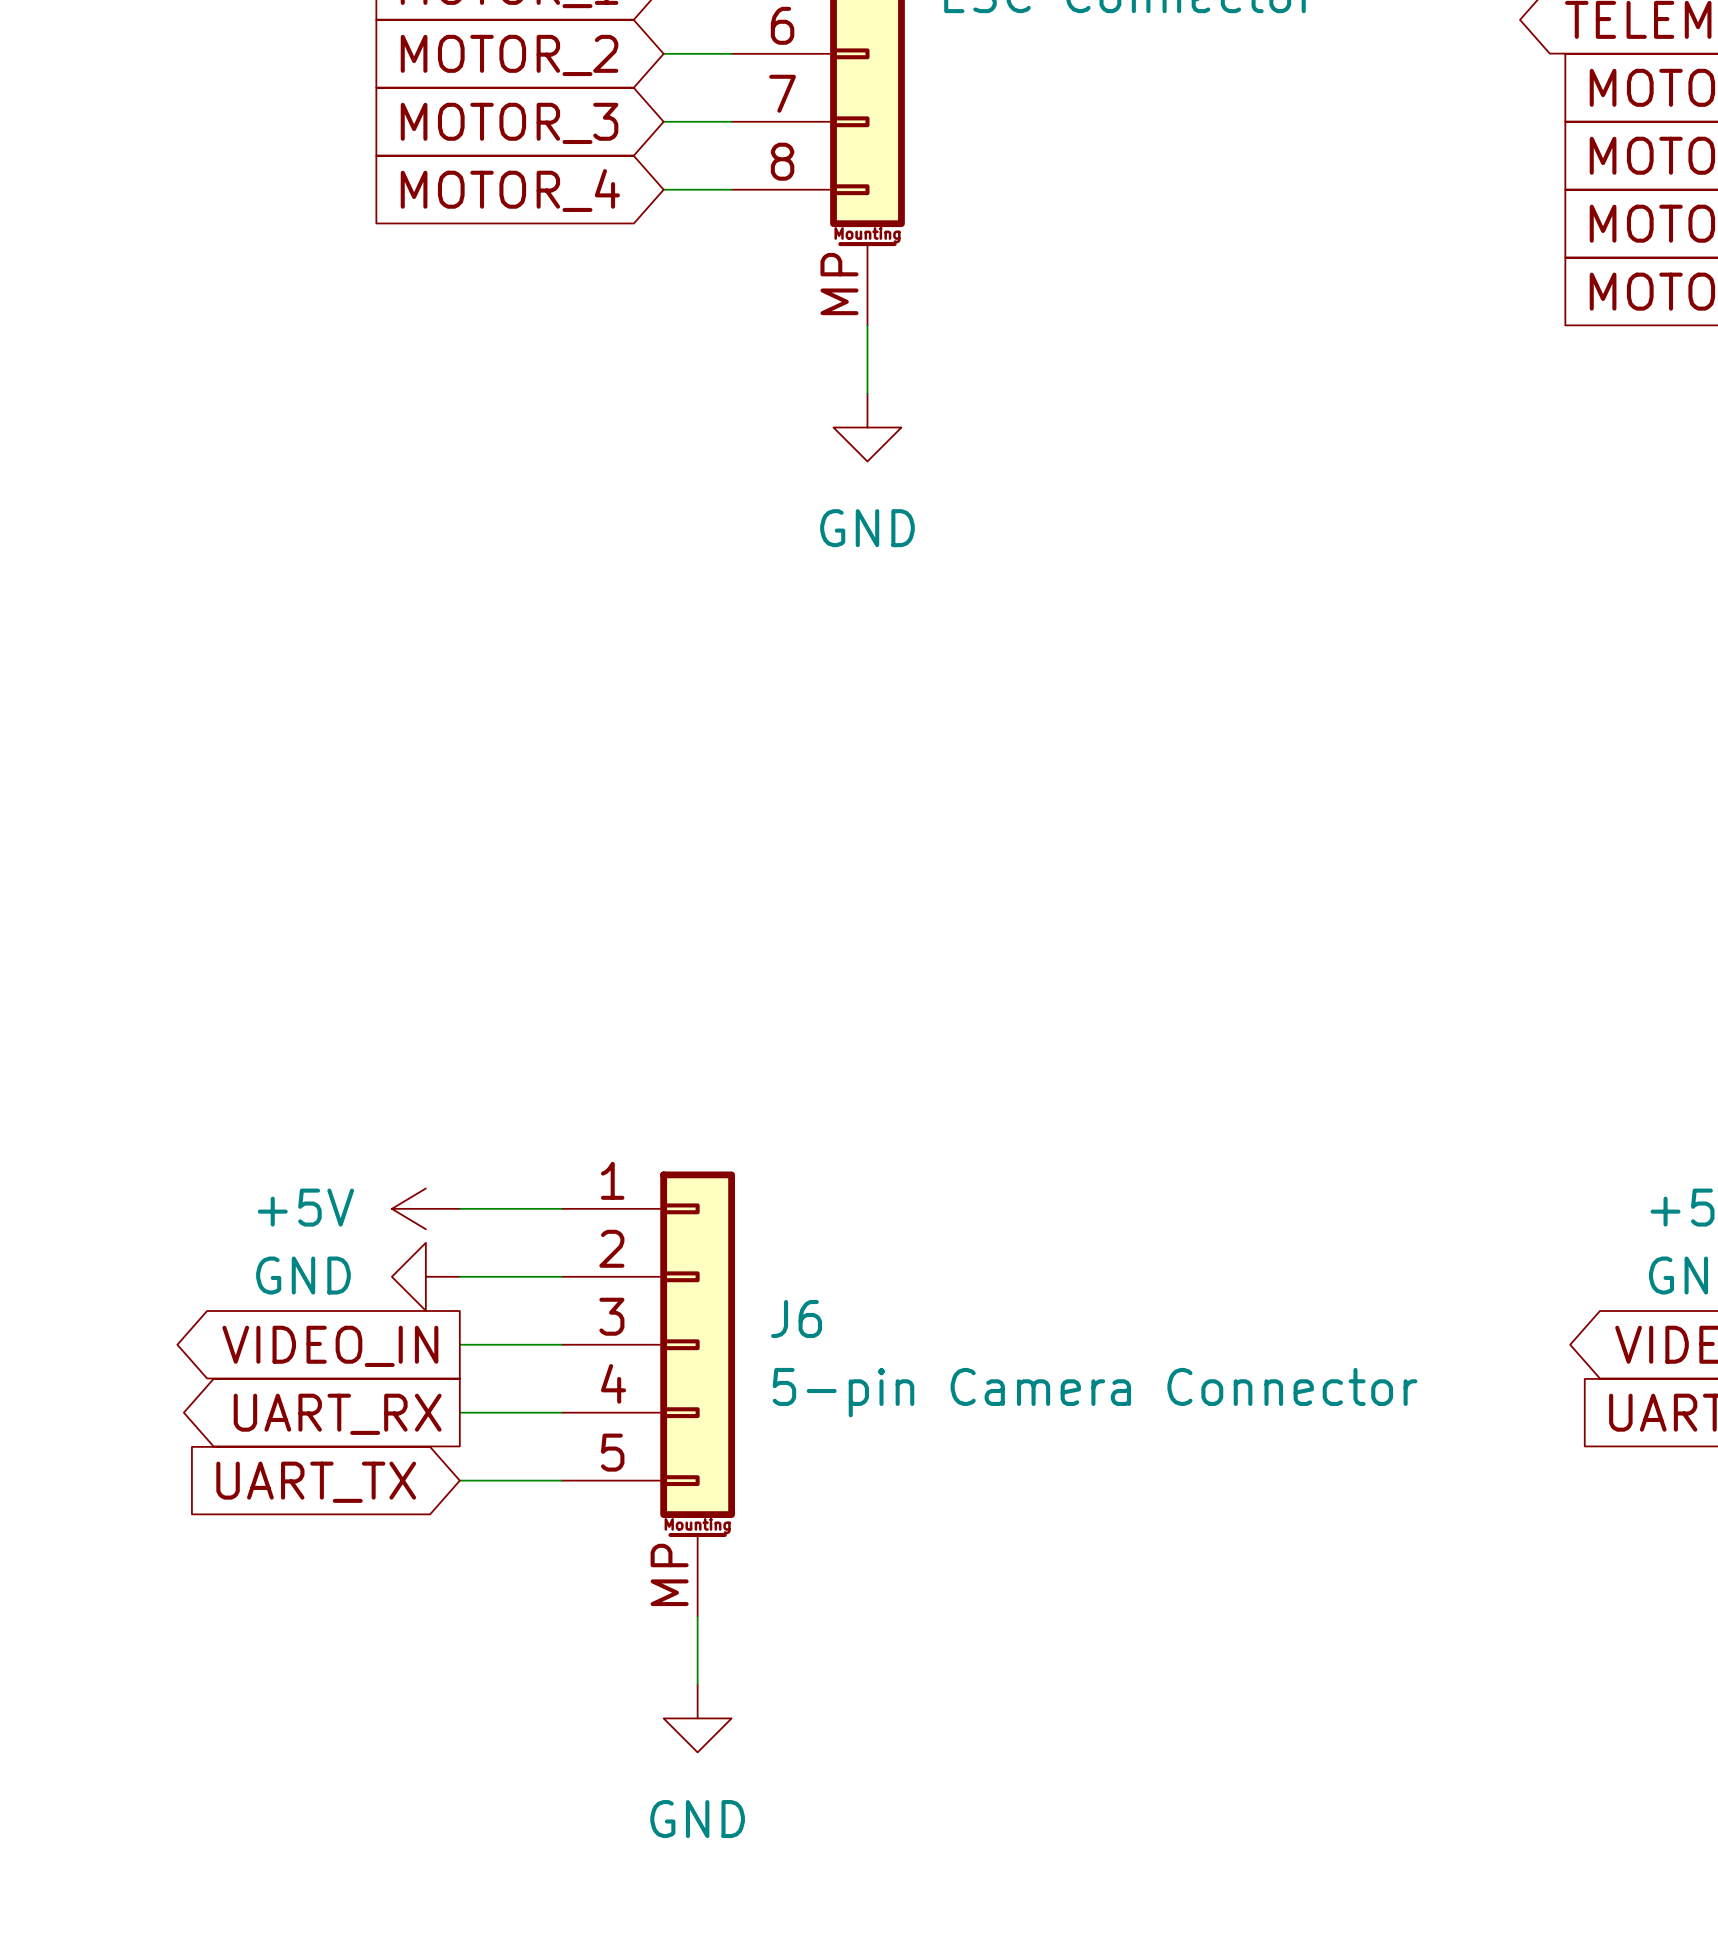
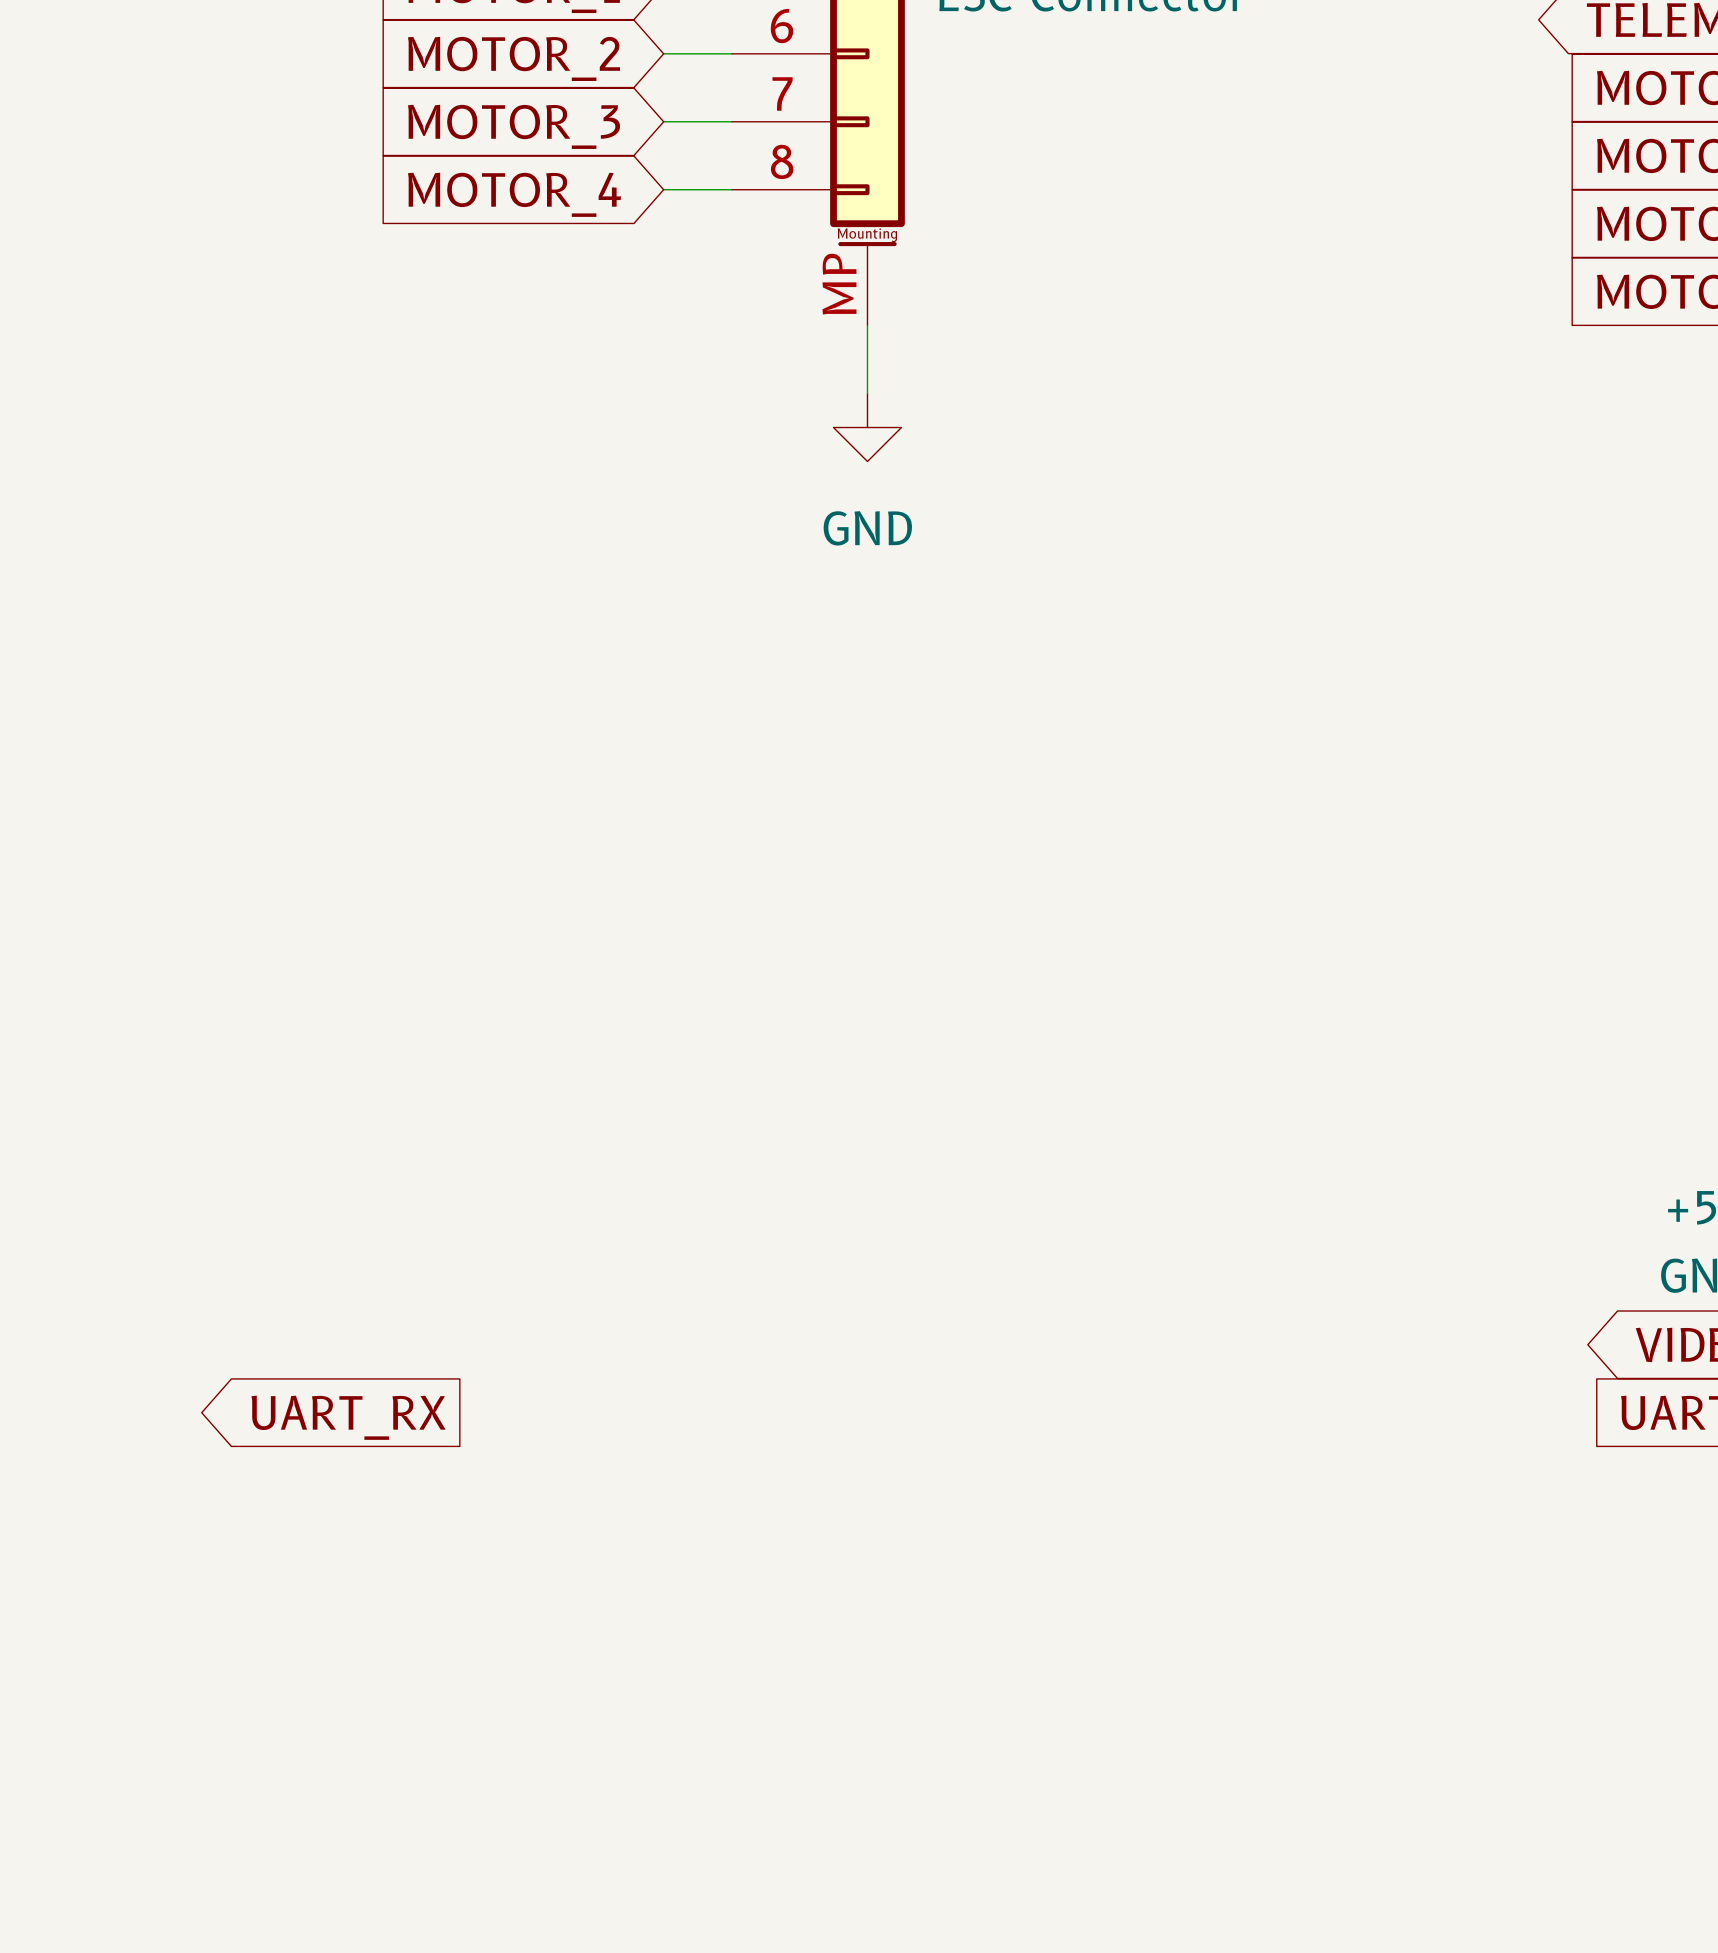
power symbol: +5V (425, 1208) -> none
wire: (459, 1208) (561, 1208) -> none
power symbol: GND (425, 1276) -> none
wire: (459, 1276) (561, 1276) -> none
wire: (459, 1344) (561, 1344) -> none
global label: VIDEO_IN (330, 1346) -> none
J6: 5-pin Camera Connector (648, 1394) -> none
wire: (459, 1412) (561, 1412) -> none
wire: (459, 1480) (561, 1480) -> none
global label: UART_TX (316, 1482) -> none
wire: (697, 1616) (697, 1684) -> none
power symbol: GND (697, 1718) -> none

